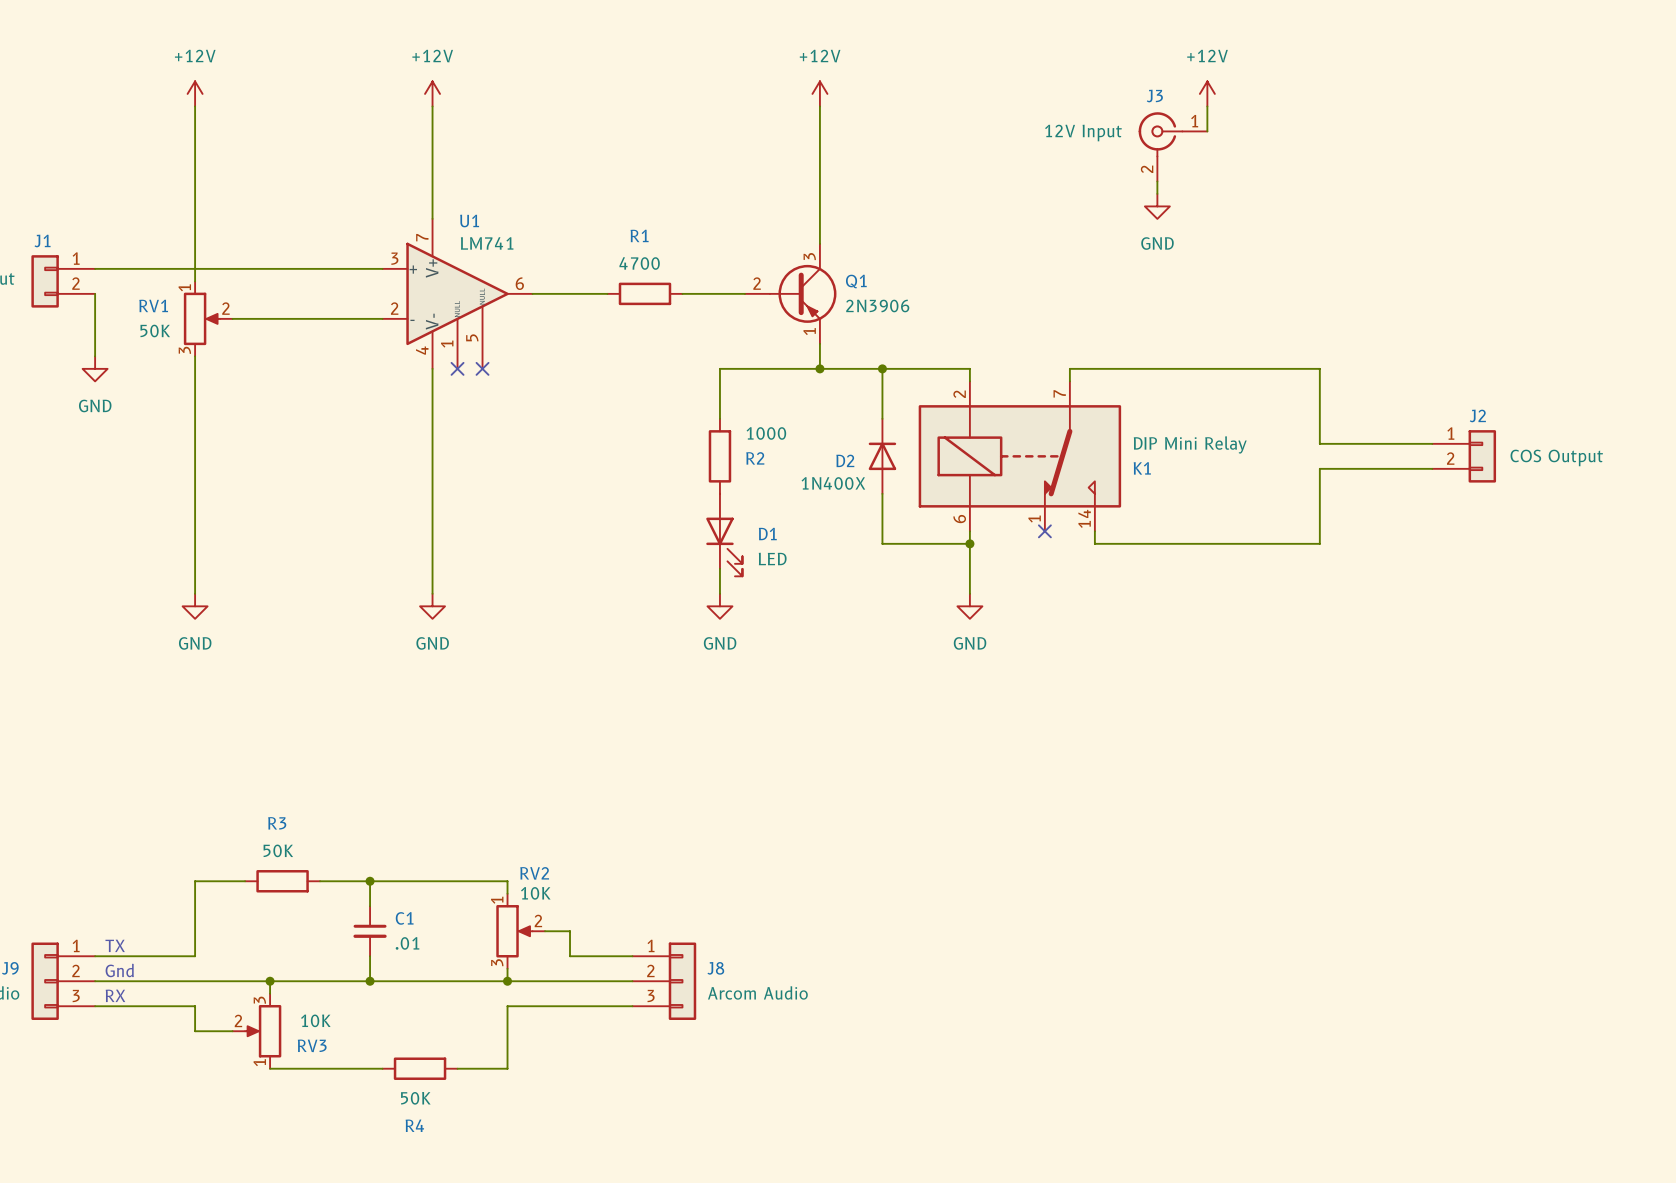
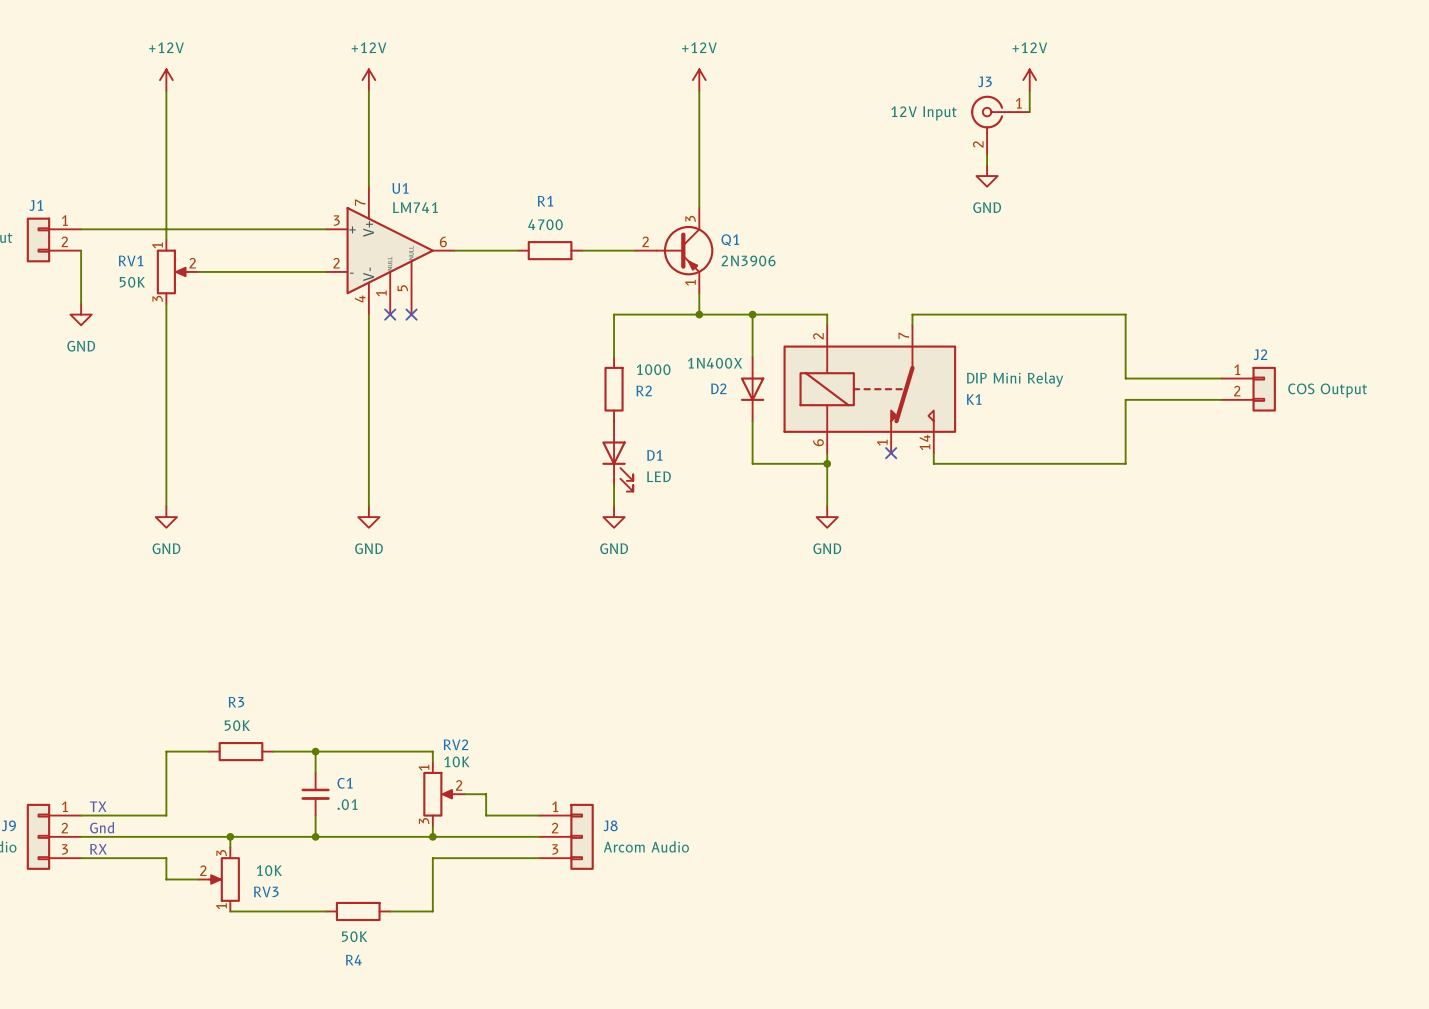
D2 rotation: 0° (882, 456) -> 180° (752, 389)
D2 value position: 1N400X (833, 483) -> 1N400X (715, 363)

